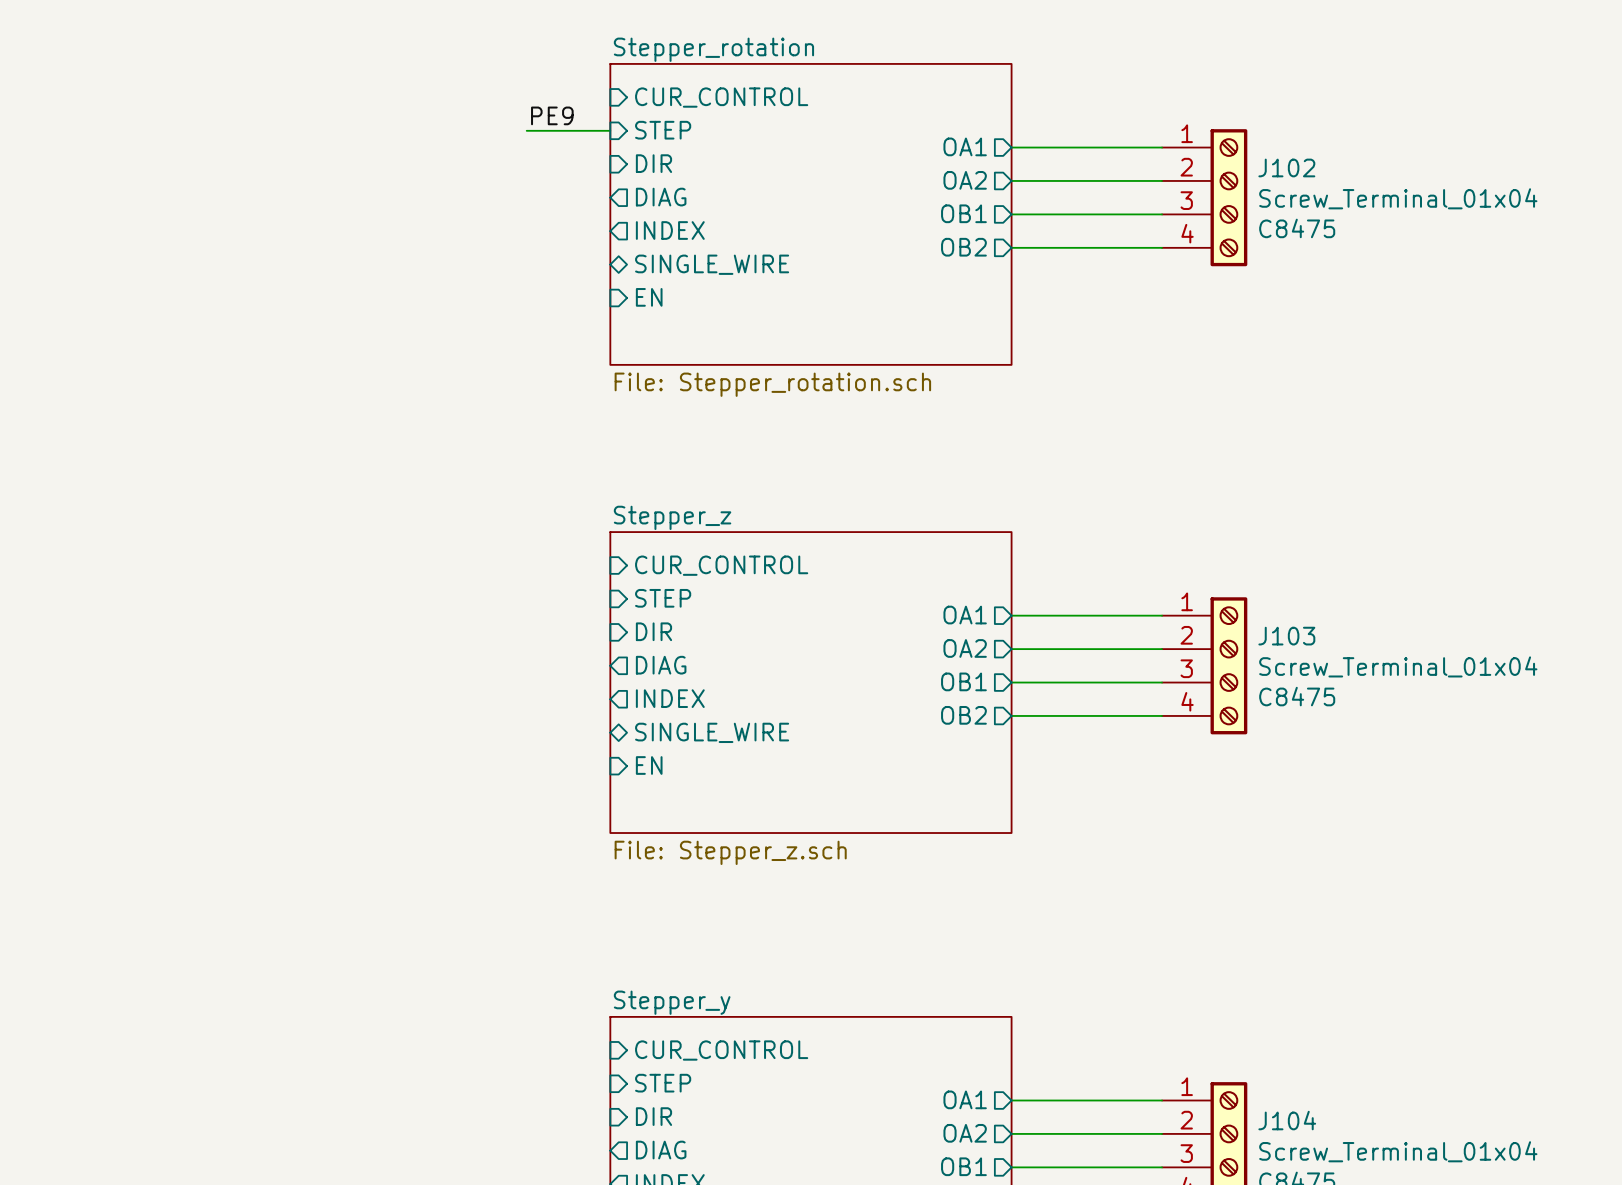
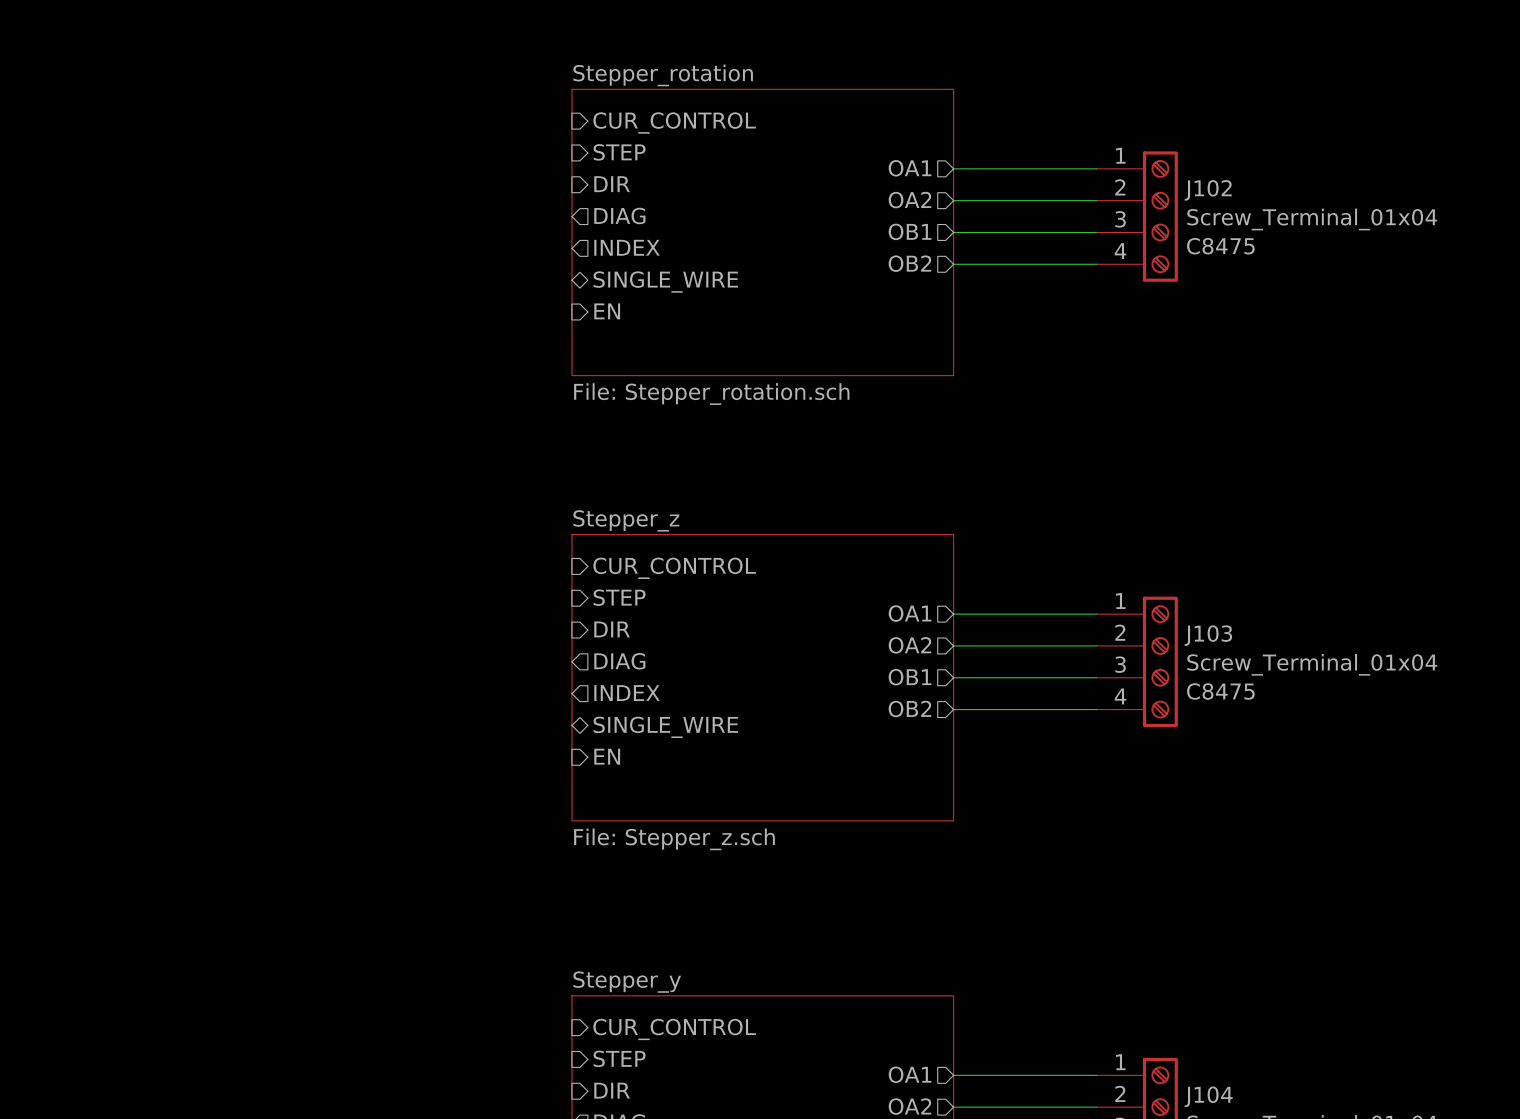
label: PE9 (552, 115) -> none
wire: (526, 130) (610, 130) -> none

